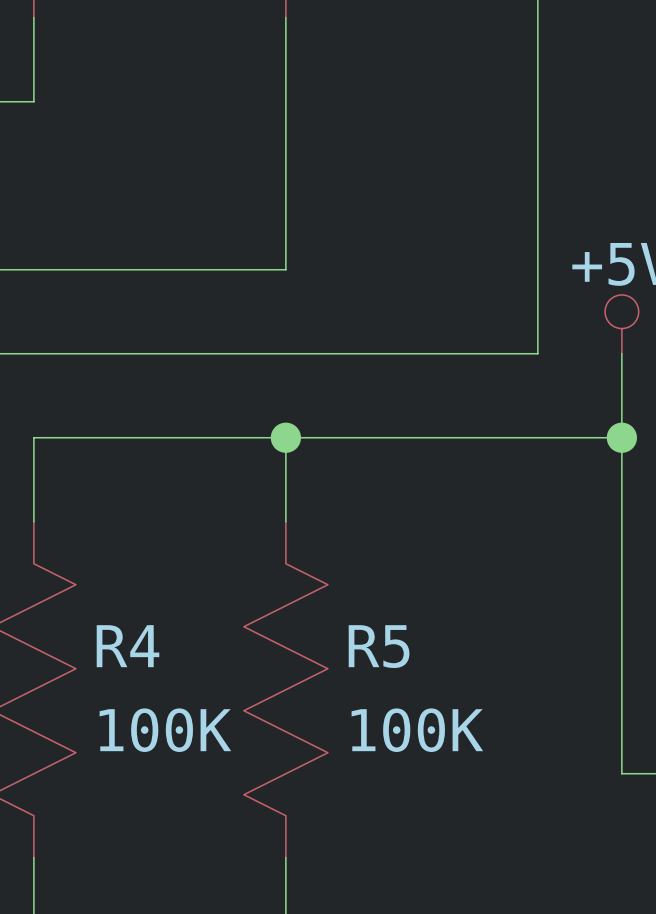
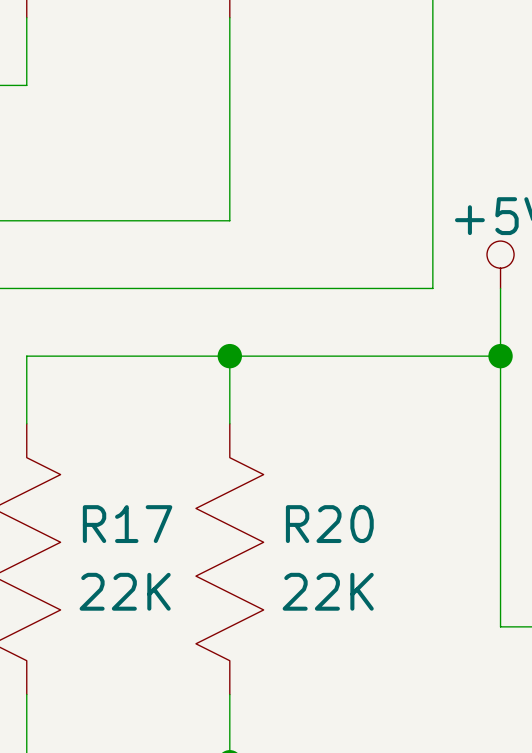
R4 name: R4 (128, 646) -> R17 (127, 524)
R5 name: R5 (379, 646) -> R20 (329, 524)
R4 value: 100K (165, 730) -> 22K (125, 591)
R5 value: 100K (417, 730) -> 22K (328, 591)

